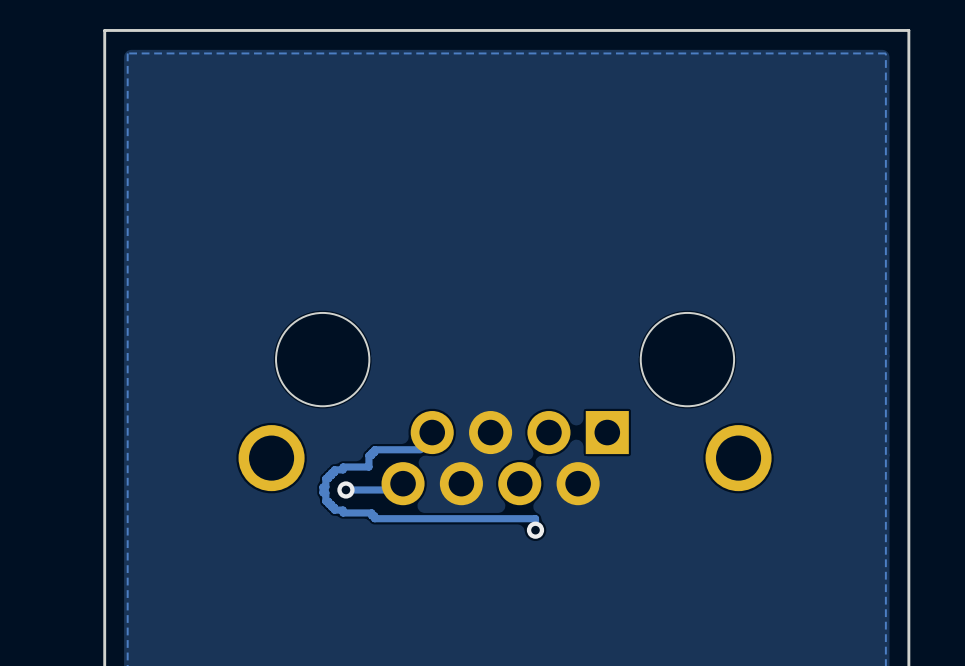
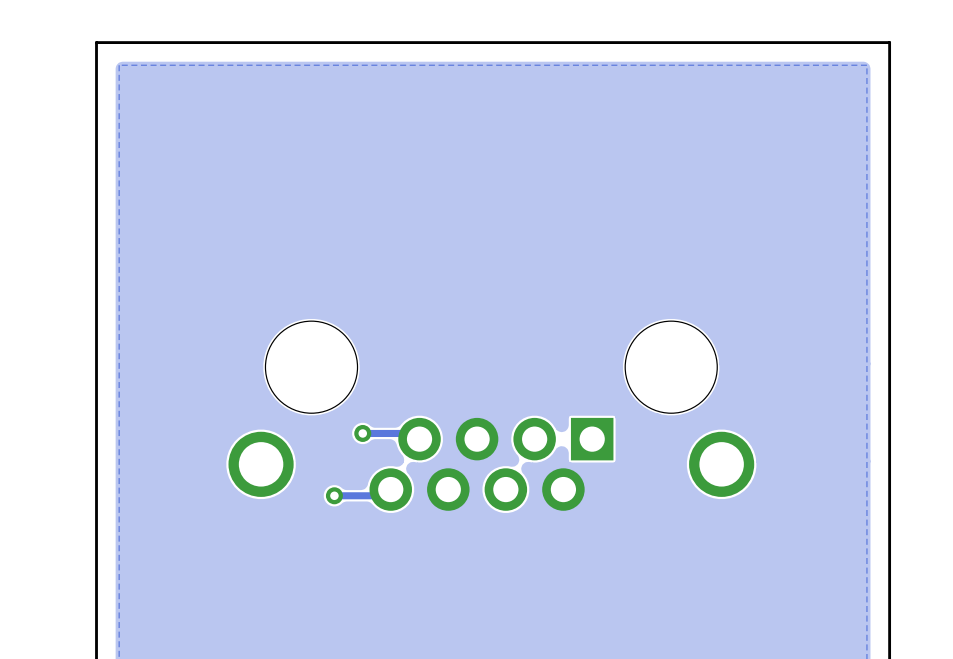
via: none -> (362, 433)
track: none -> (402, 433) (362, 433)
track: (420, 449) (374, 449) (371, 455) (368, 455) (368, 467) (343, 467) (343, 469) (334, 469) (334, 472) (331, 472) (328, 478) (325, 478) (325, 487) (322, 487) (322, 492) (325, 492) (325, 501) (328, 501) (328, 504) (331, 504) (334, 510) (343, 510) (343, 512) (371, 512) (374, 518) (535, 518) (535, 530) -> none
via: (535, 530) -> none

